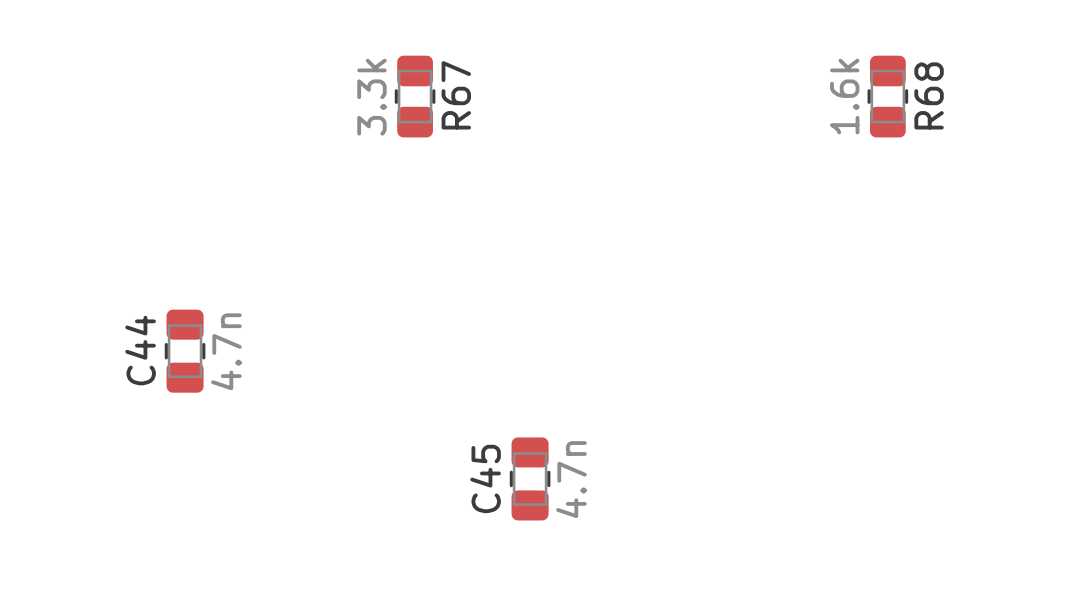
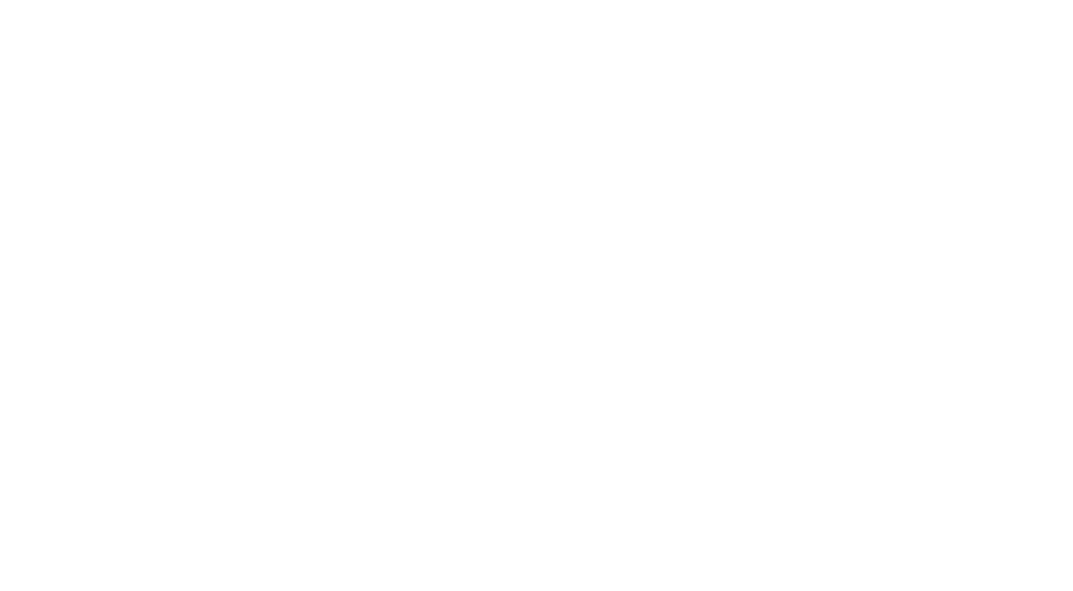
R67: 3.3k (415, 96) -> none
R68: 1.6k (887, 96) -> none
C44: 4.7n (185, 351) -> none
C45: 4.7n (530, 478) -> none

